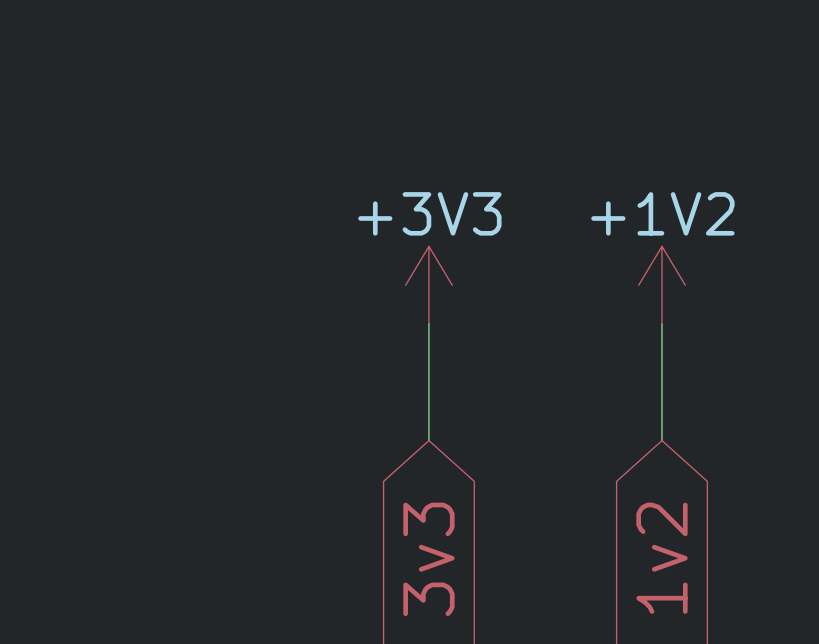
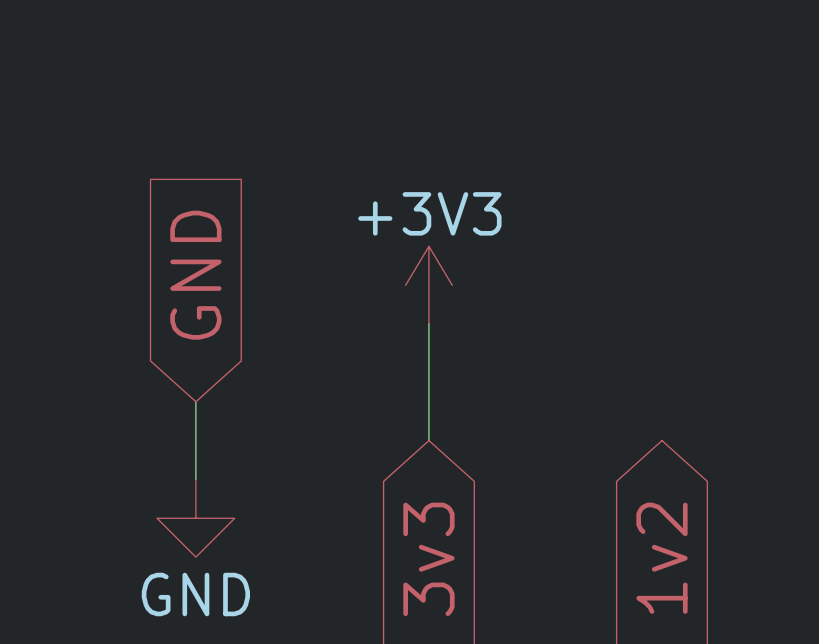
global label: none -> GND (195, 275)
power symbol: +1V2 (661, 285) -> none
wire: (661, 324) (661, 440) -> none
wire: none -> (195, 401) (195, 479)
power symbol: none -> GND (195, 518)

